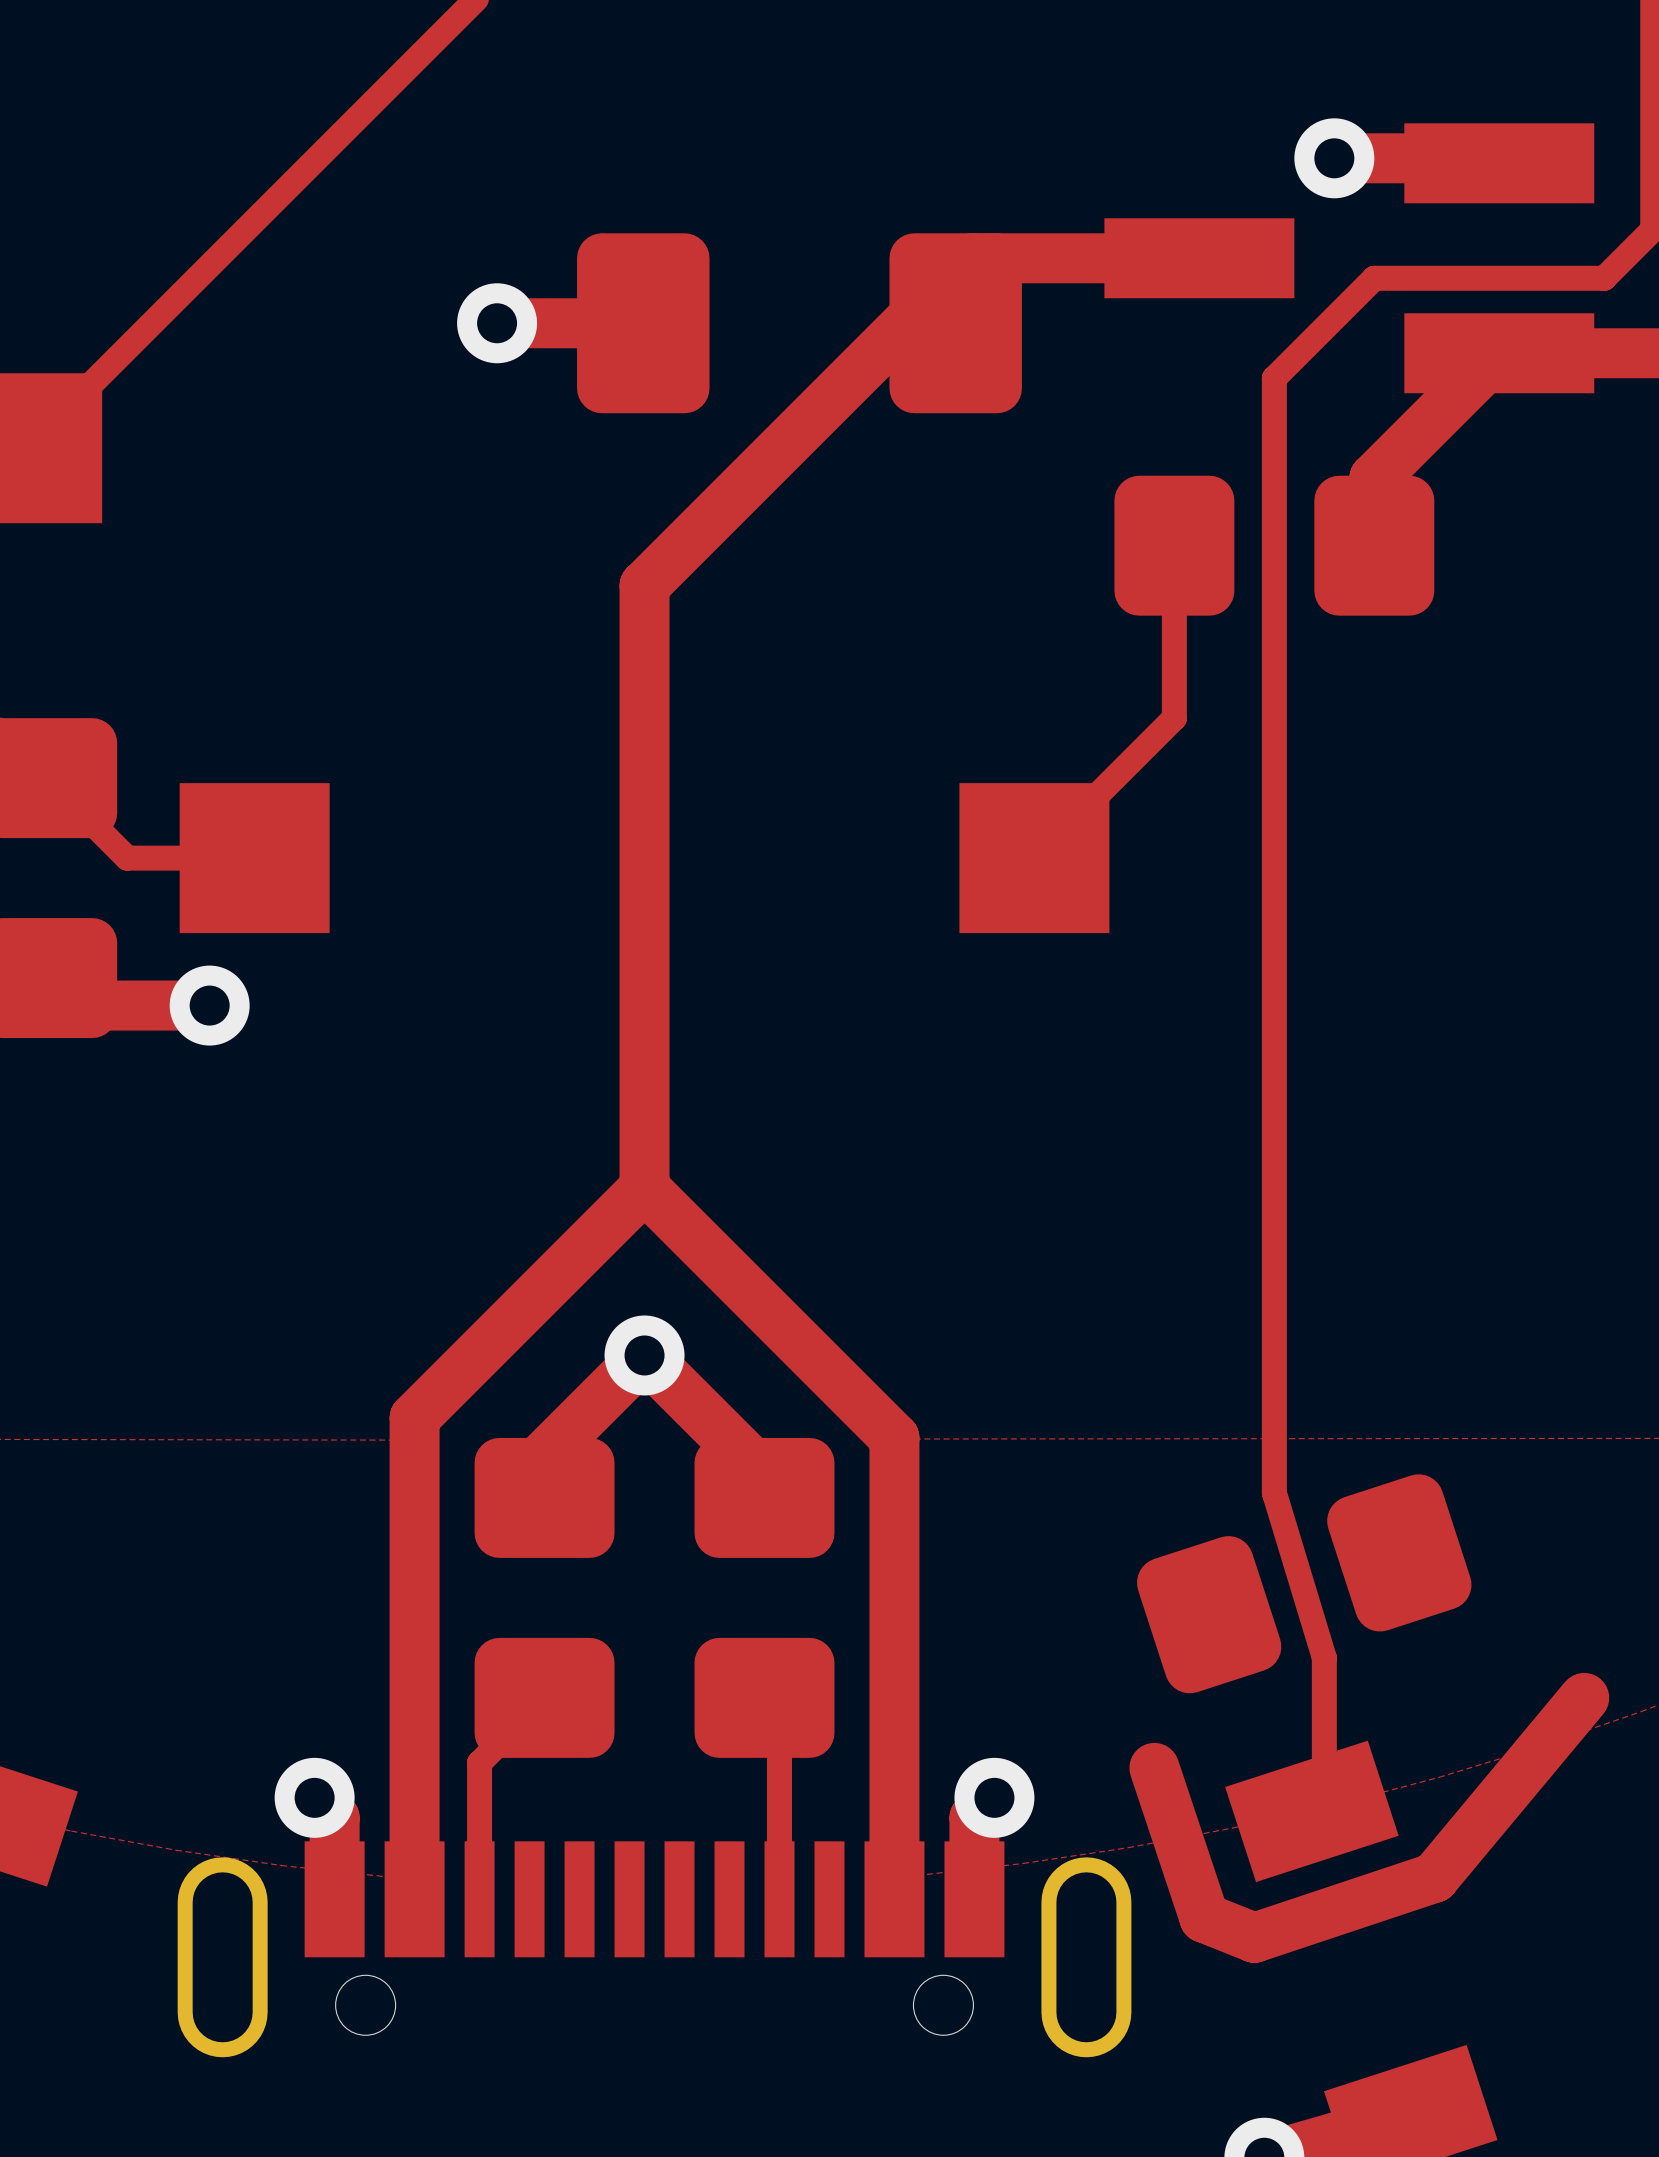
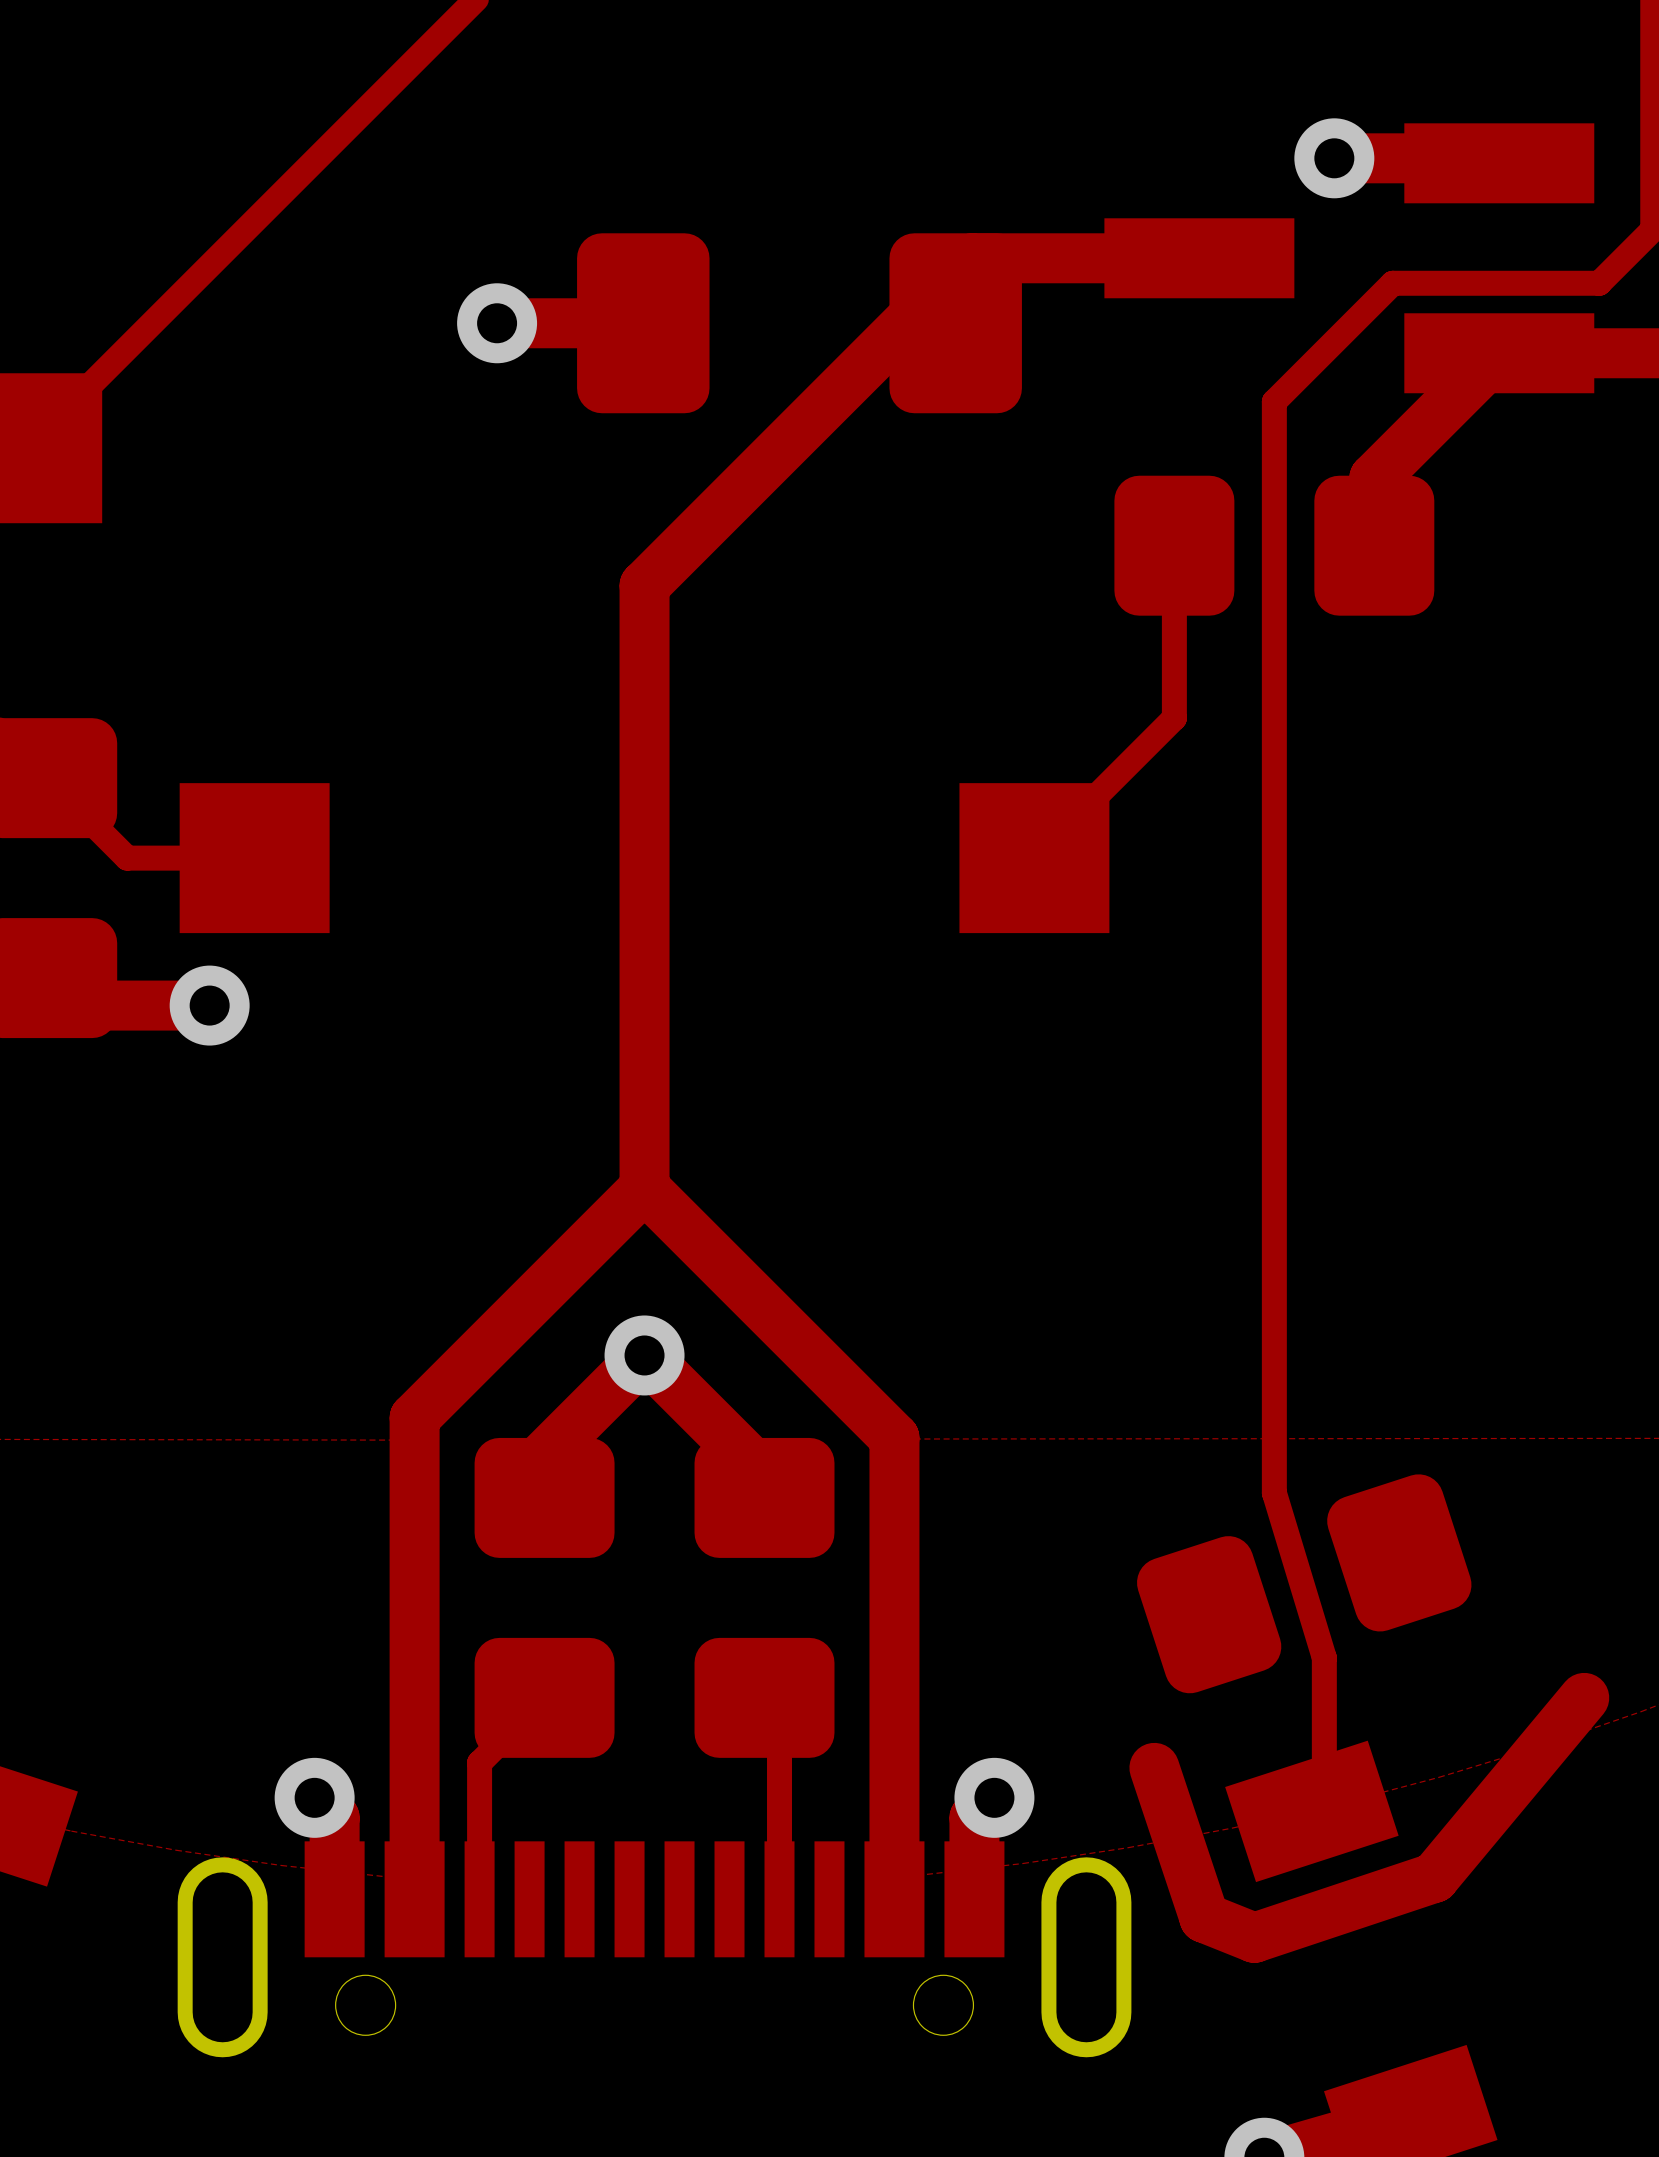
top track: (1604, 278) (1374, 278) (1274, 378) (1274, 401) -> (1604, 278) (1599, 283) (1392, 283) (1274, 401)

